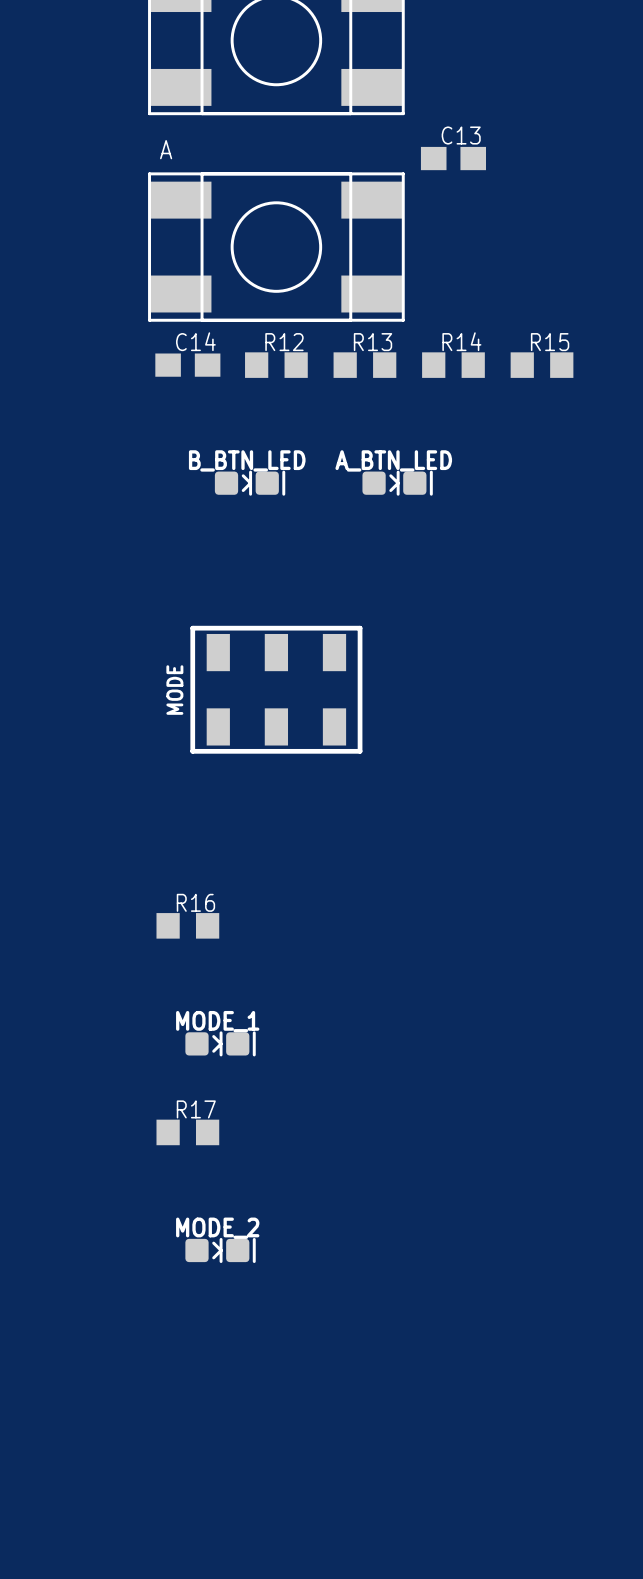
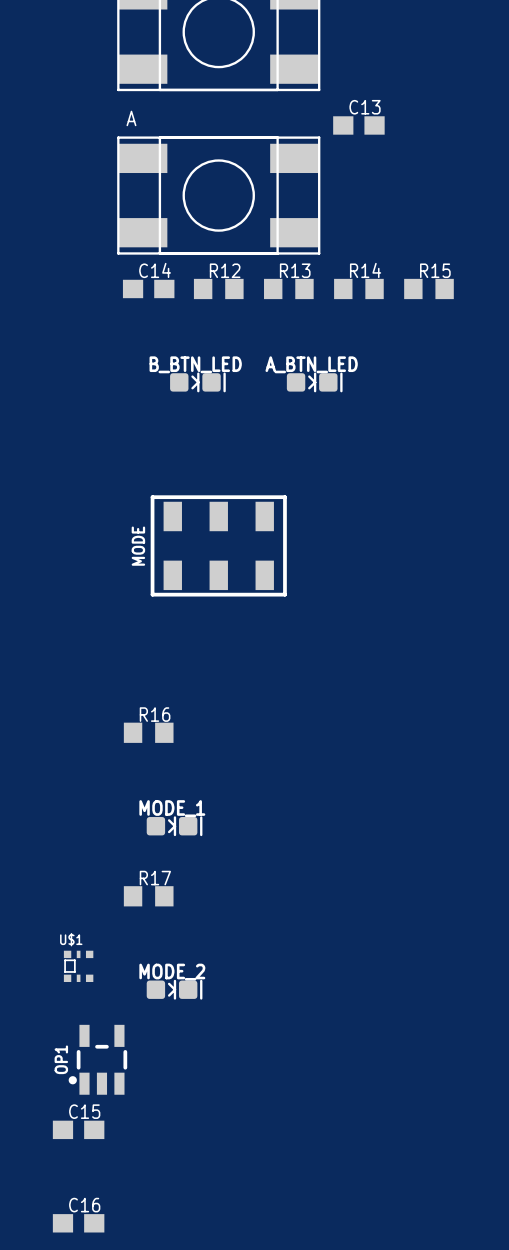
U$1: none -> (78, 966)
OP1: none -> (97, 1059)
C15: none -> (78, 1129)
C16: none -> (78, 1223)

